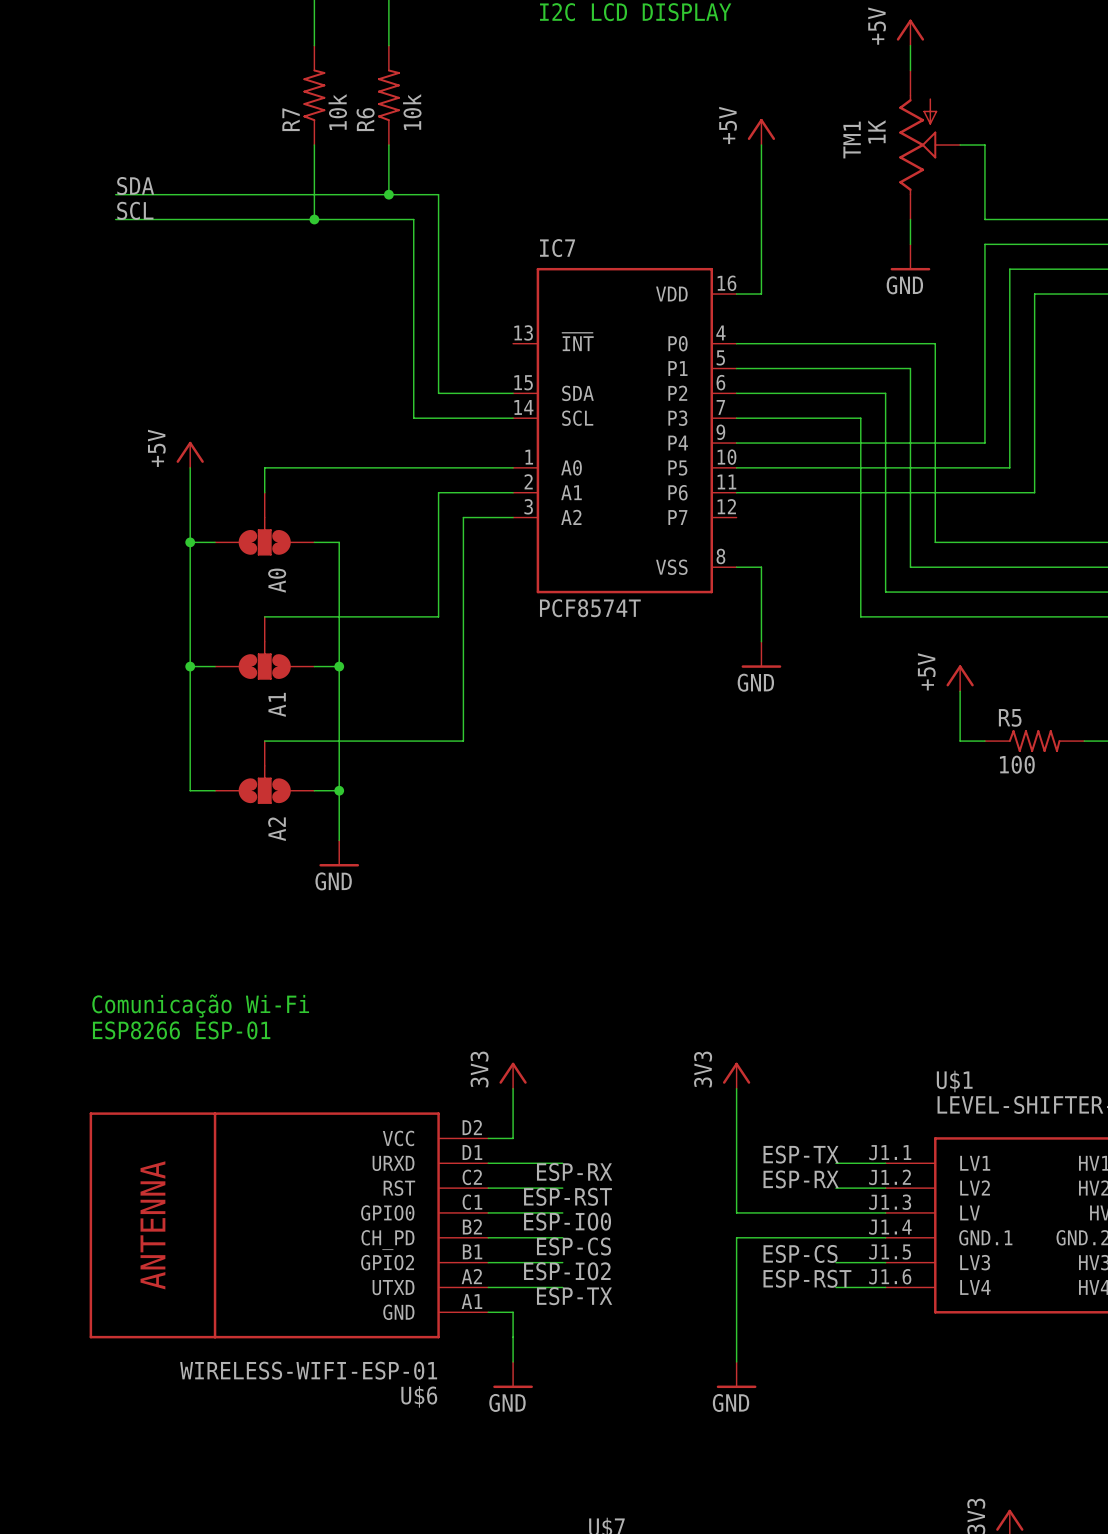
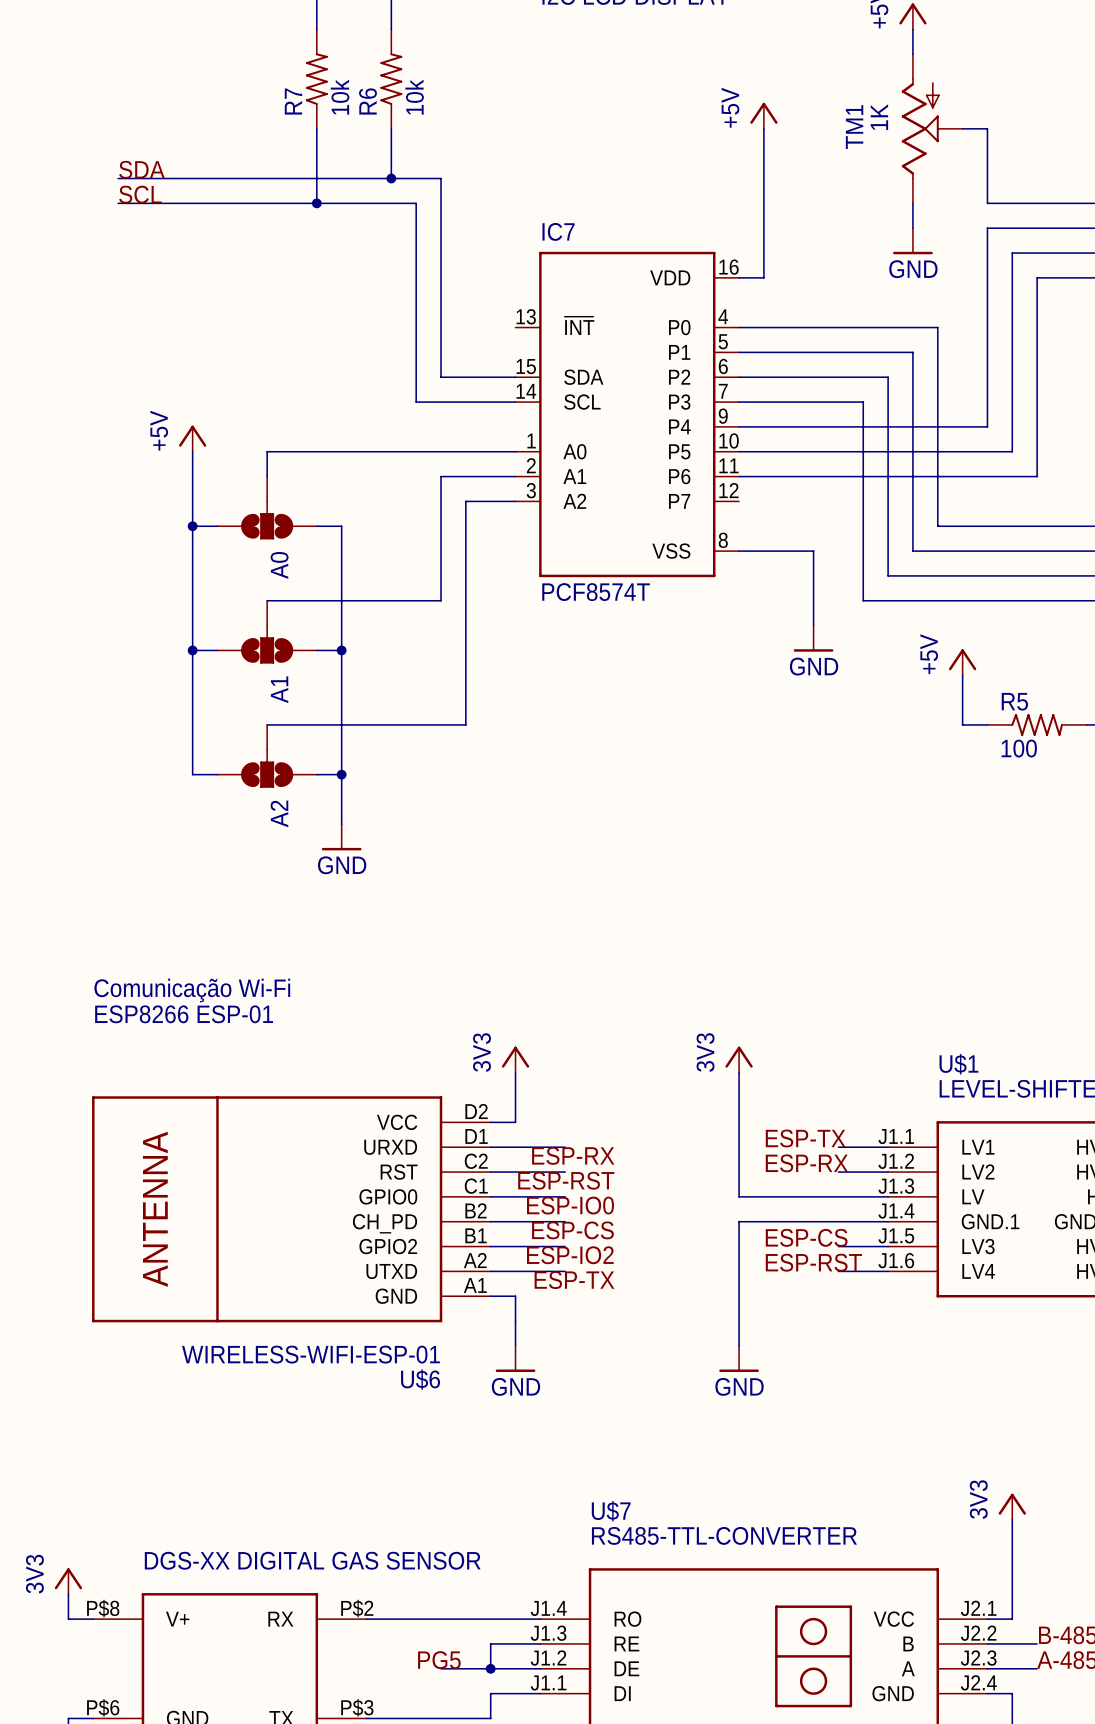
wire: (761, 567) (761, 641) -> (763, 551) (813, 551) (813, 625)
power symbol position: GND (761, 654) -> GND (813, 638)

